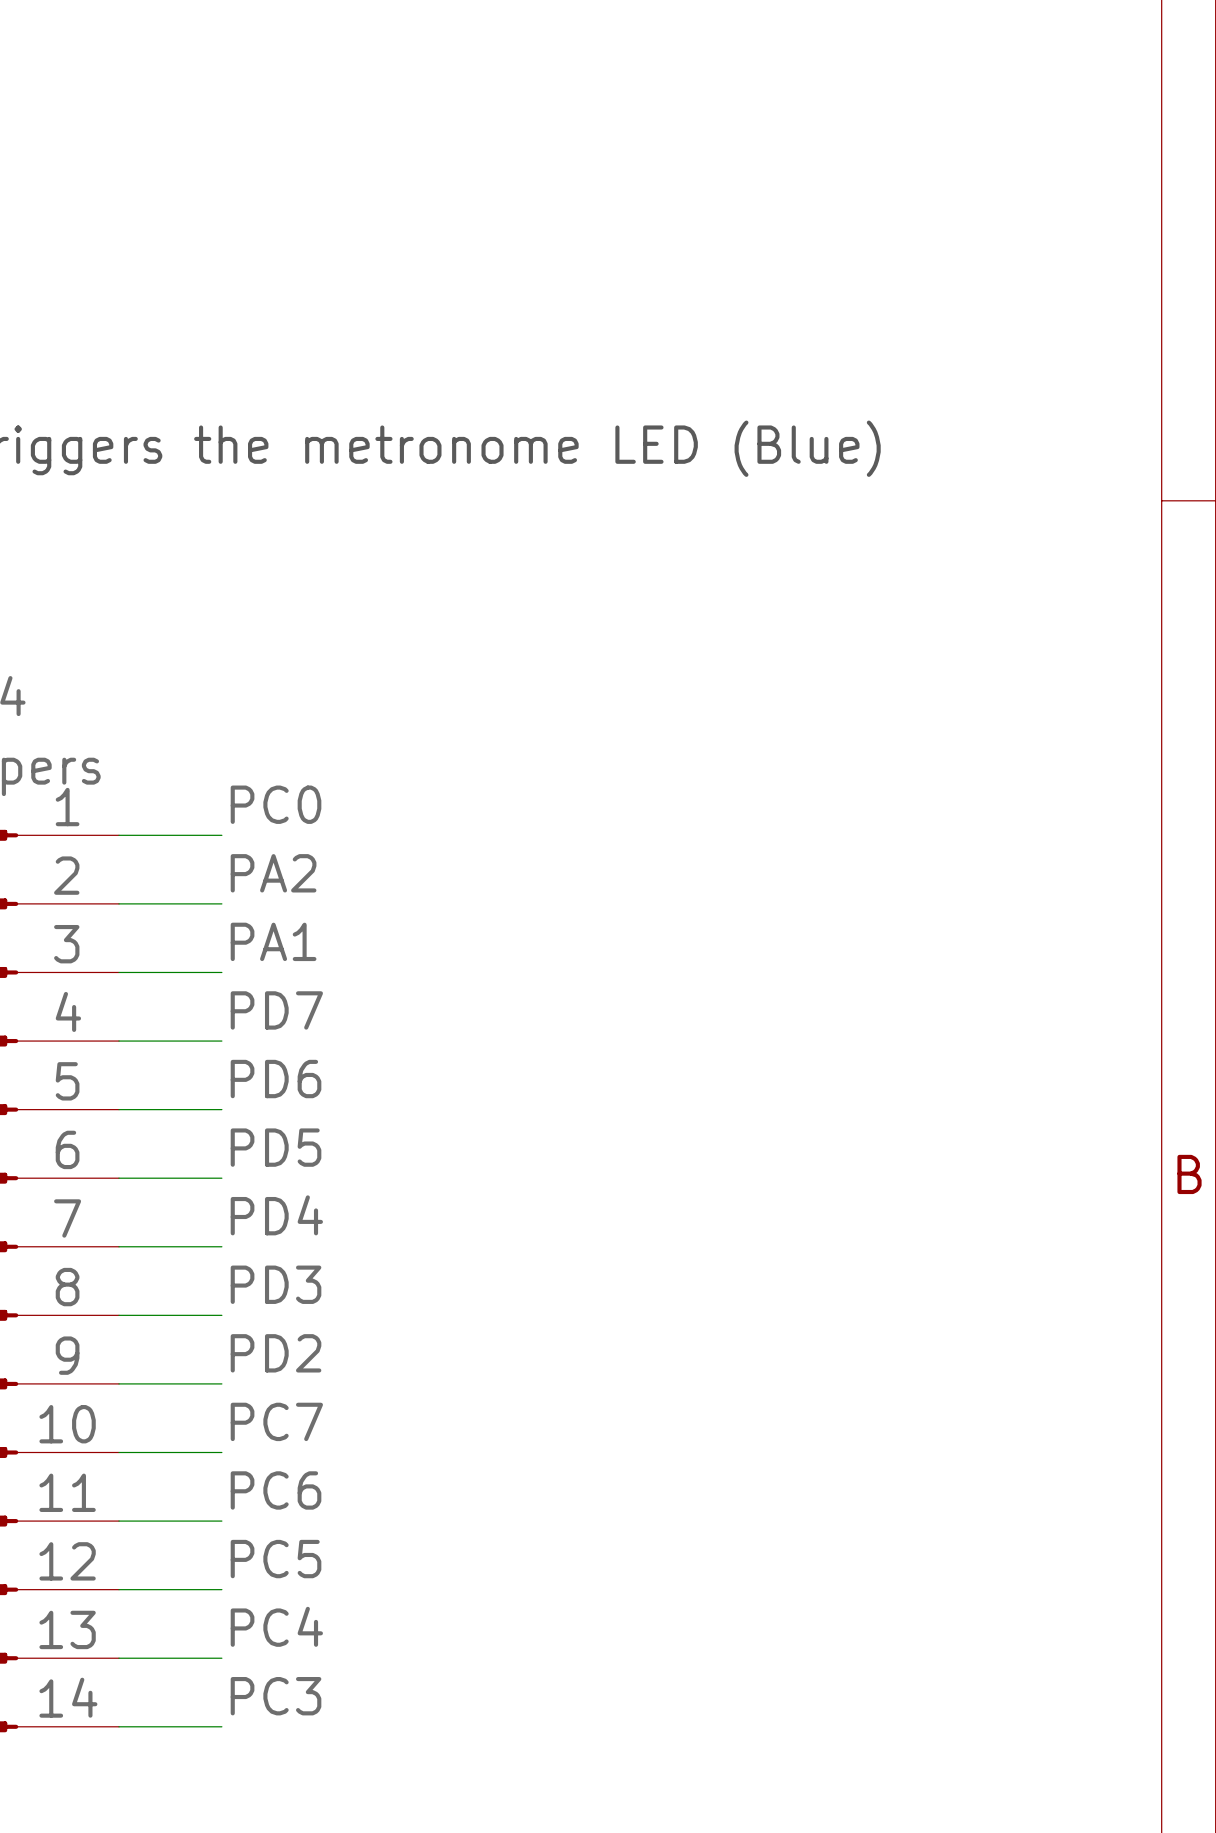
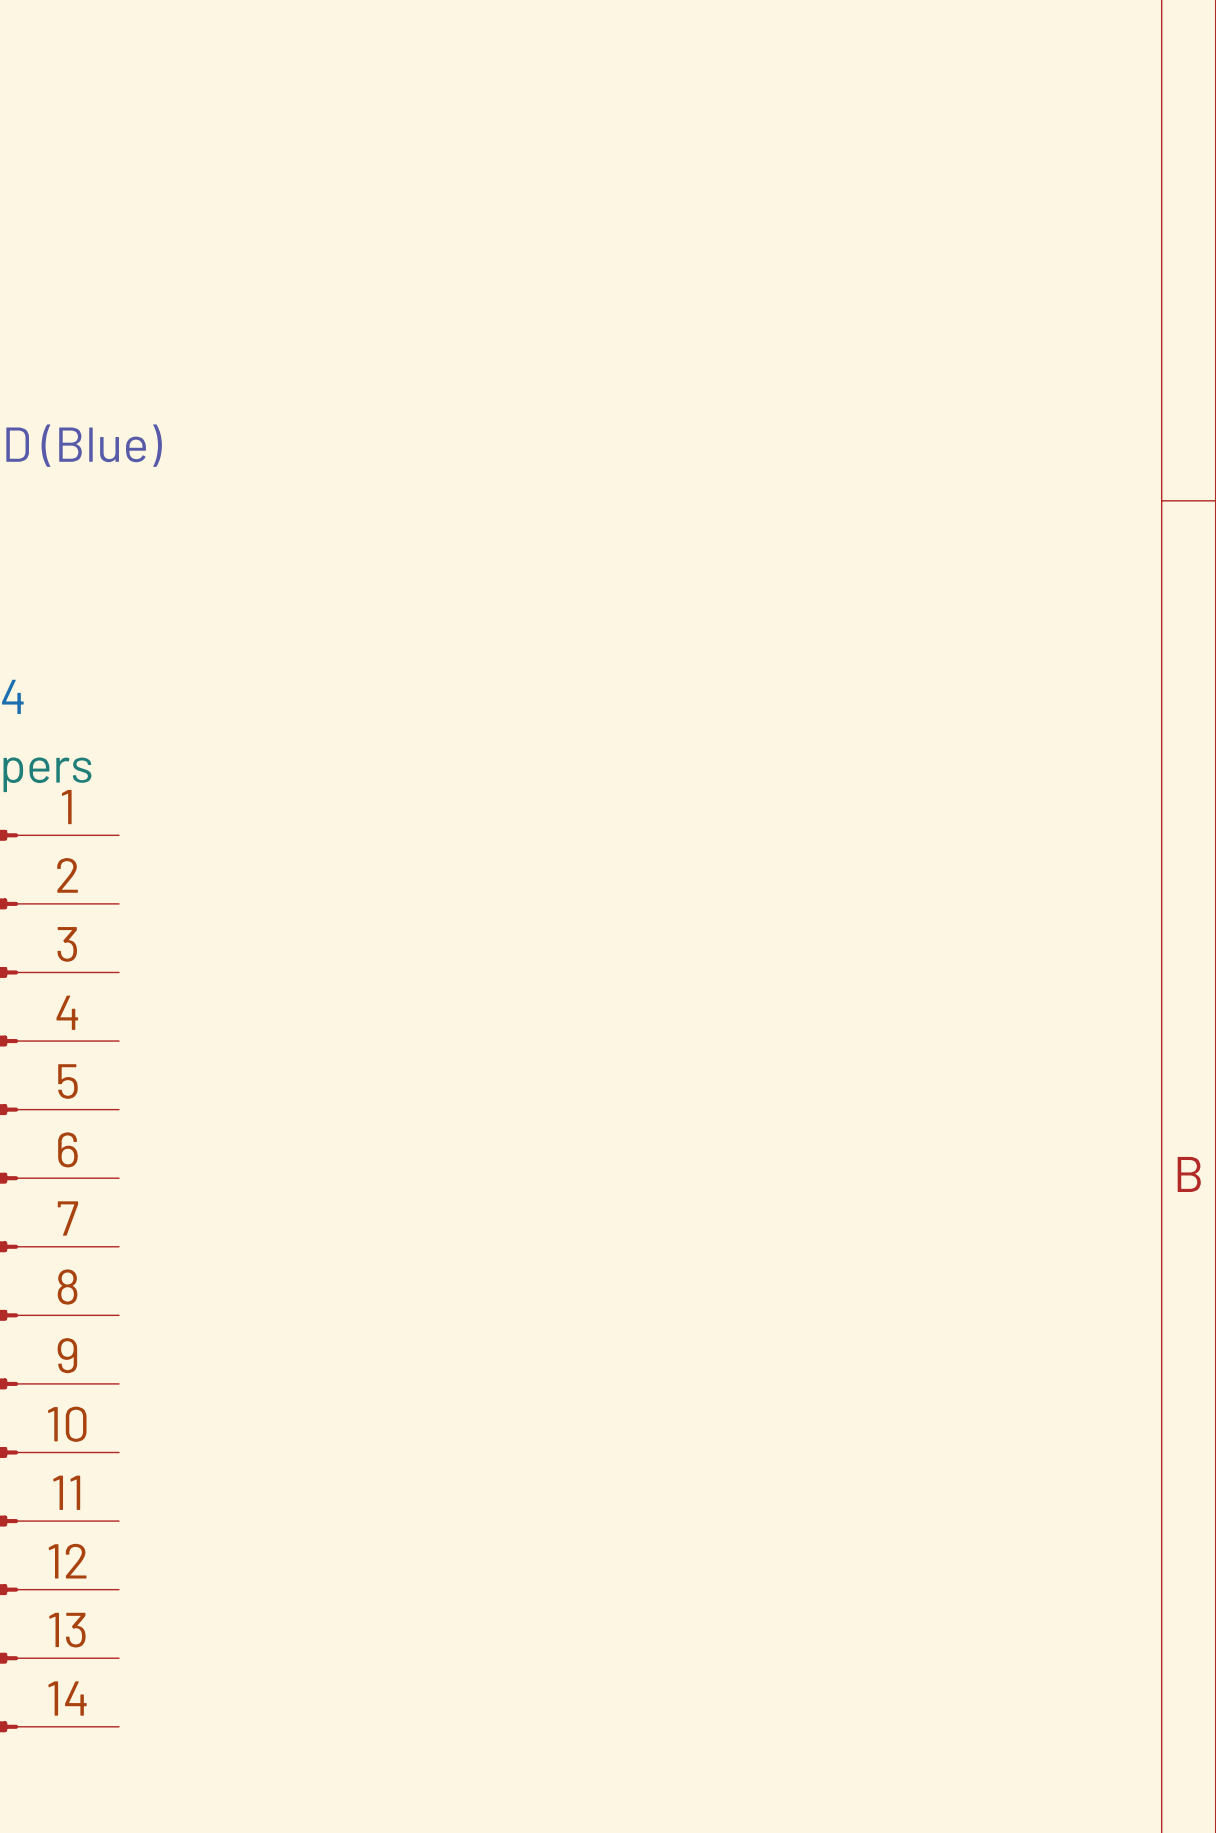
label: PC0 (276, 804) -> none
wire: (119, 835) (221, 835) -> none
label: PA2 (273, 873) -> none
wire: (119, 903) (221, 903) -> none
label: PA1 (273, 941) -> none
wire: (119, 972) (221, 972) -> none
label: PD7 (276, 1010) -> none
wire: (119, 1041) (221, 1041) -> none
label: PD6 (276, 1079) -> none
wire: (119, 1109) (221, 1109) -> none
label: PD5 (276, 1147) -> none
wire: (119, 1178) (221, 1178) -> none
label: PD4 (276, 1215) -> none
wire: (119, 1246) (221, 1246) -> none
label: PD3 (276, 1284) -> none
wire: (119, 1315) (221, 1315) -> none
label: PD2 (276, 1353) -> none
wire: (119, 1383) (221, 1383) -> none
label: PC7 (276, 1421) -> none
wire: (119, 1452) (221, 1452) -> none
label: PC6 (276, 1490) -> none
wire: (119, 1521) (221, 1521) -> none
label: PC5 (276, 1559) -> none
wire: (119, 1589) (221, 1589) -> none
label: PC4 (276, 1626) -> none
wire: (119, 1658) (221, 1658) -> none
label: PC3 (276, 1696) -> none
wire: (119, 1726) (221, 1726) -> none

